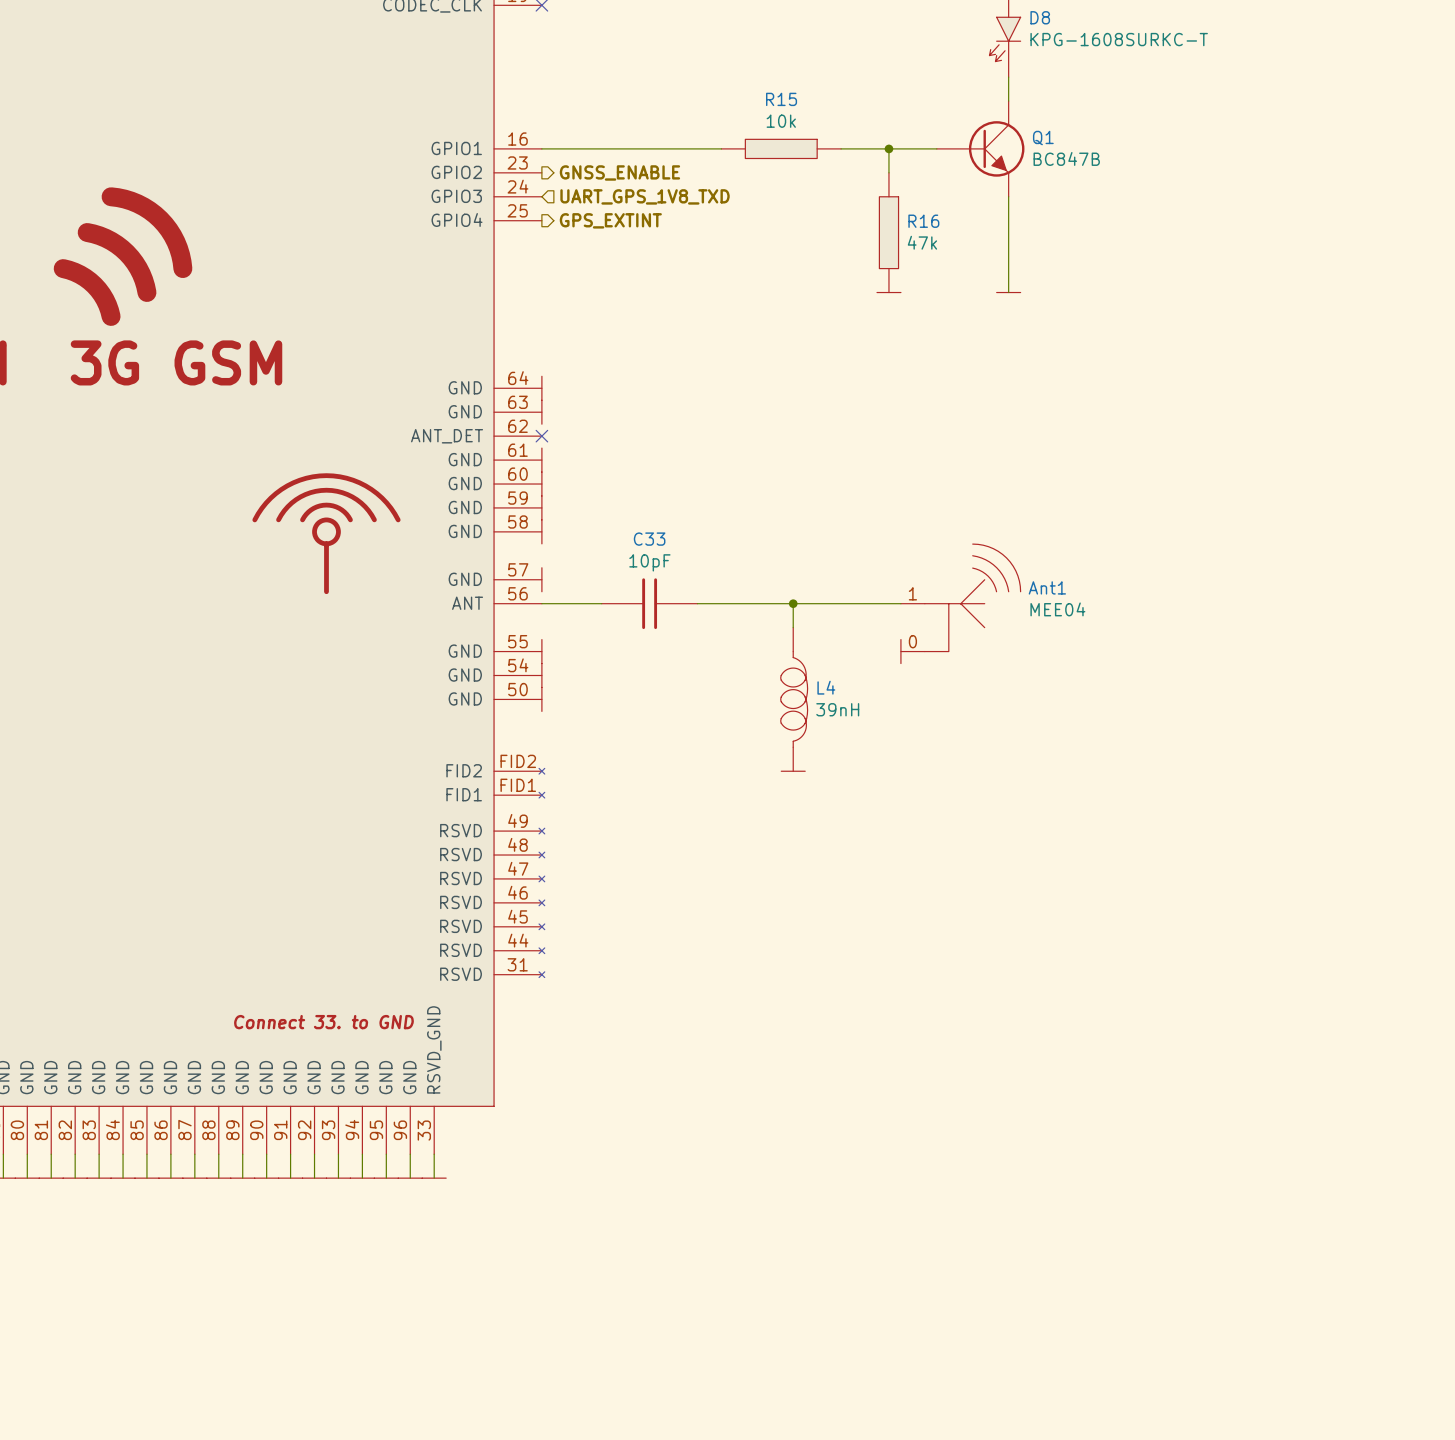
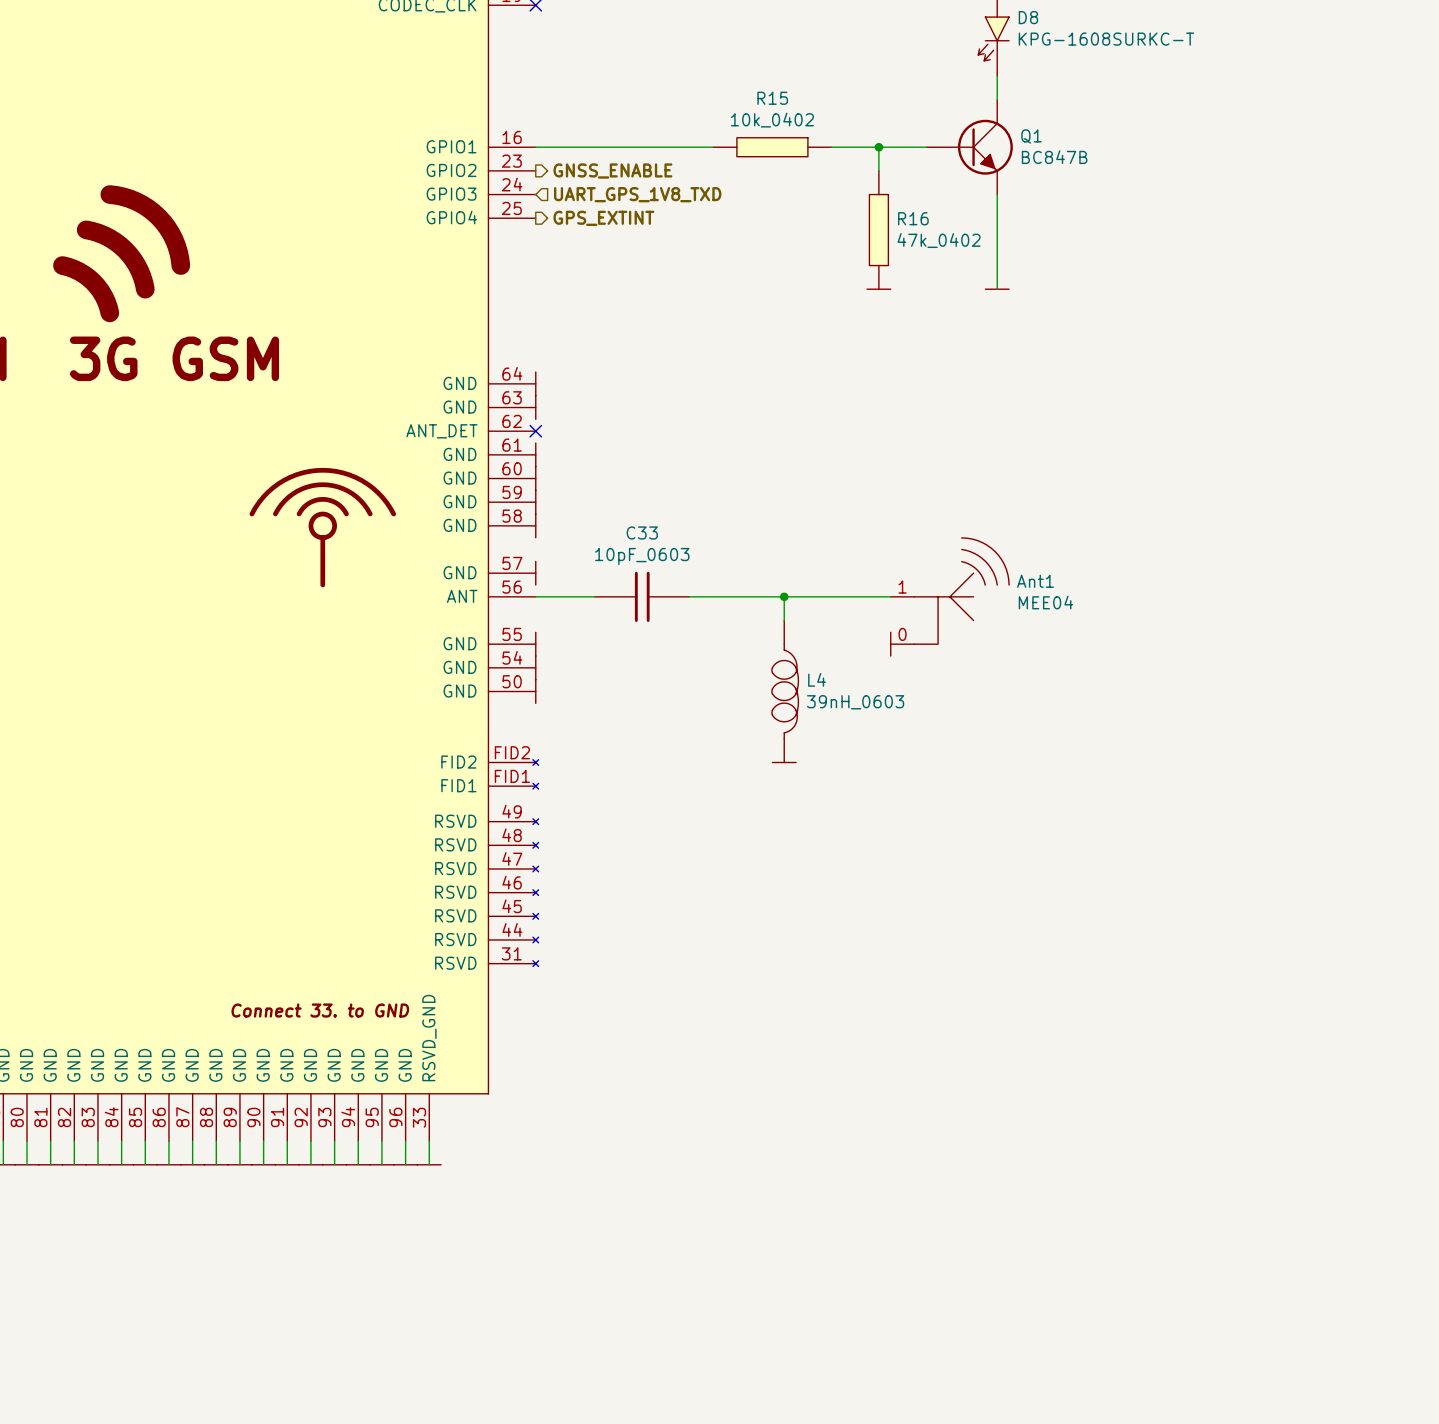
R15 value: 10k (781, 121) -> 10k_0402 (772, 120)
R16 value: 47k (922, 242) -> 47k_0402 (939, 240)
C33 value: 10pF (649, 562) -> 10pF_0603 (642, 556)
L4 value: 39nH (837, 709) -> 39nH_0603 (855, 702)

